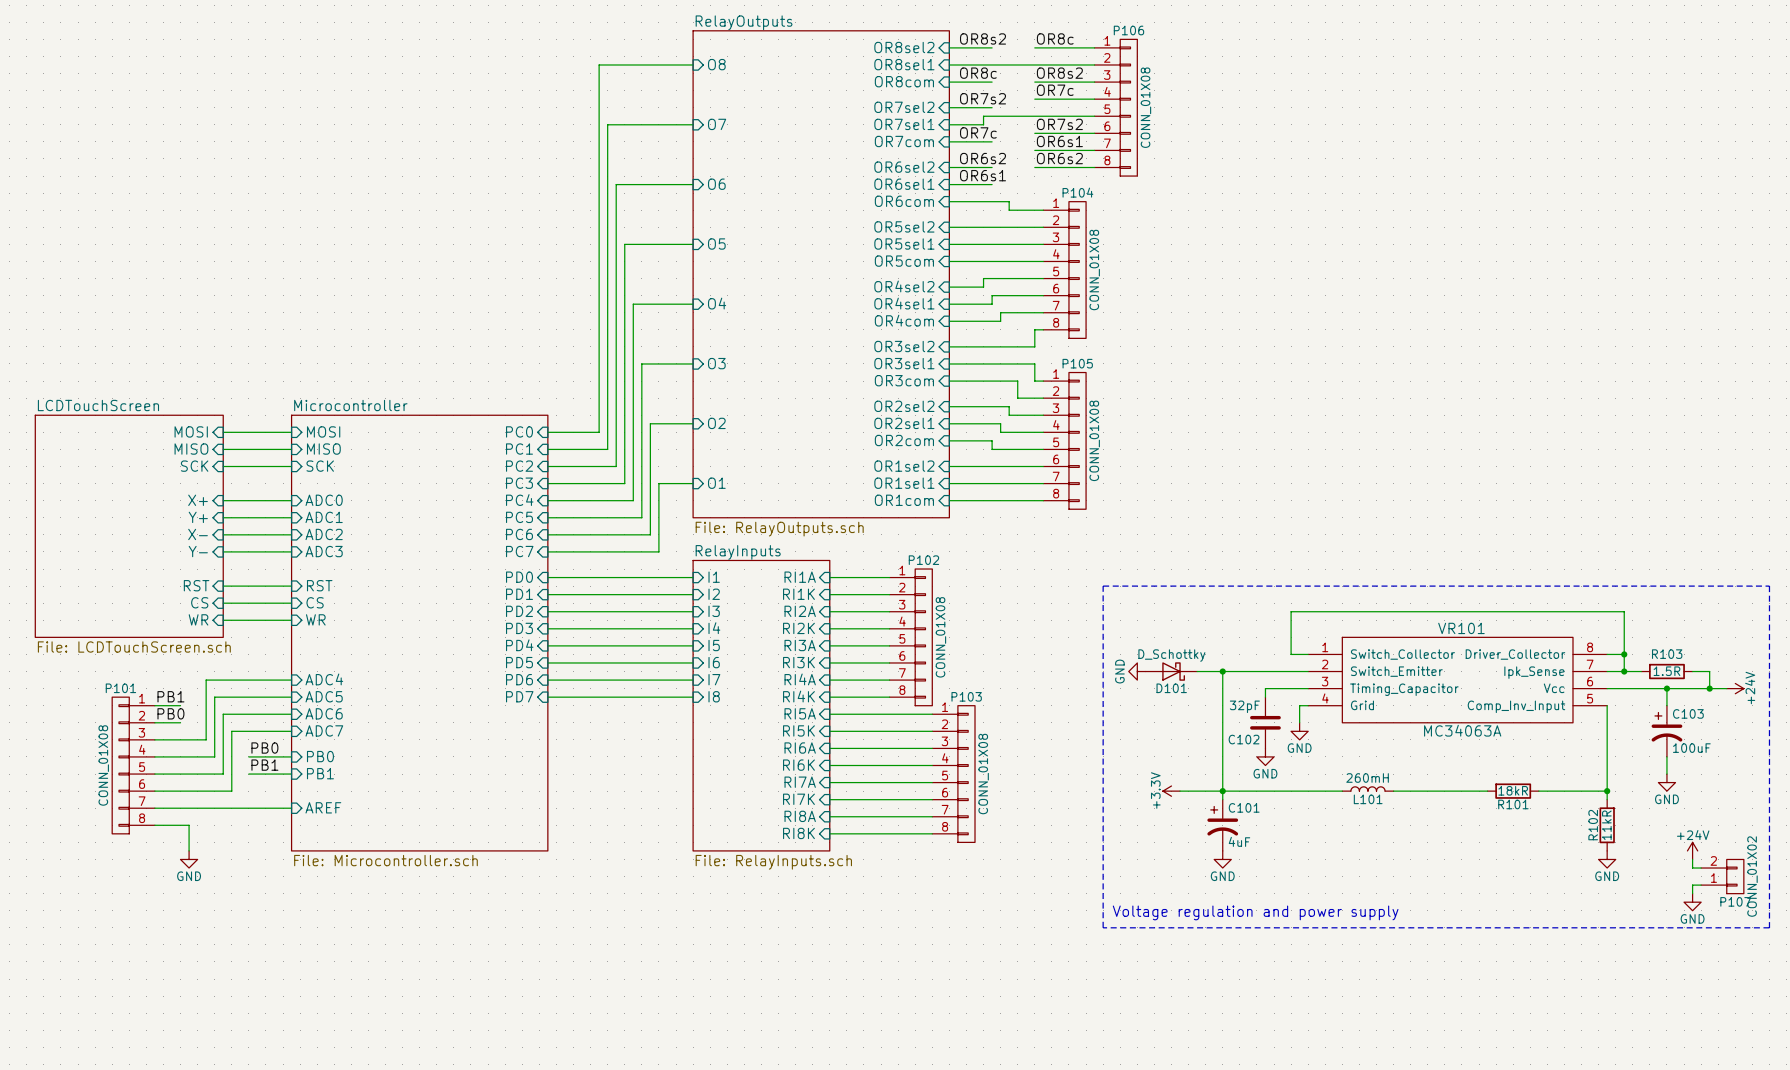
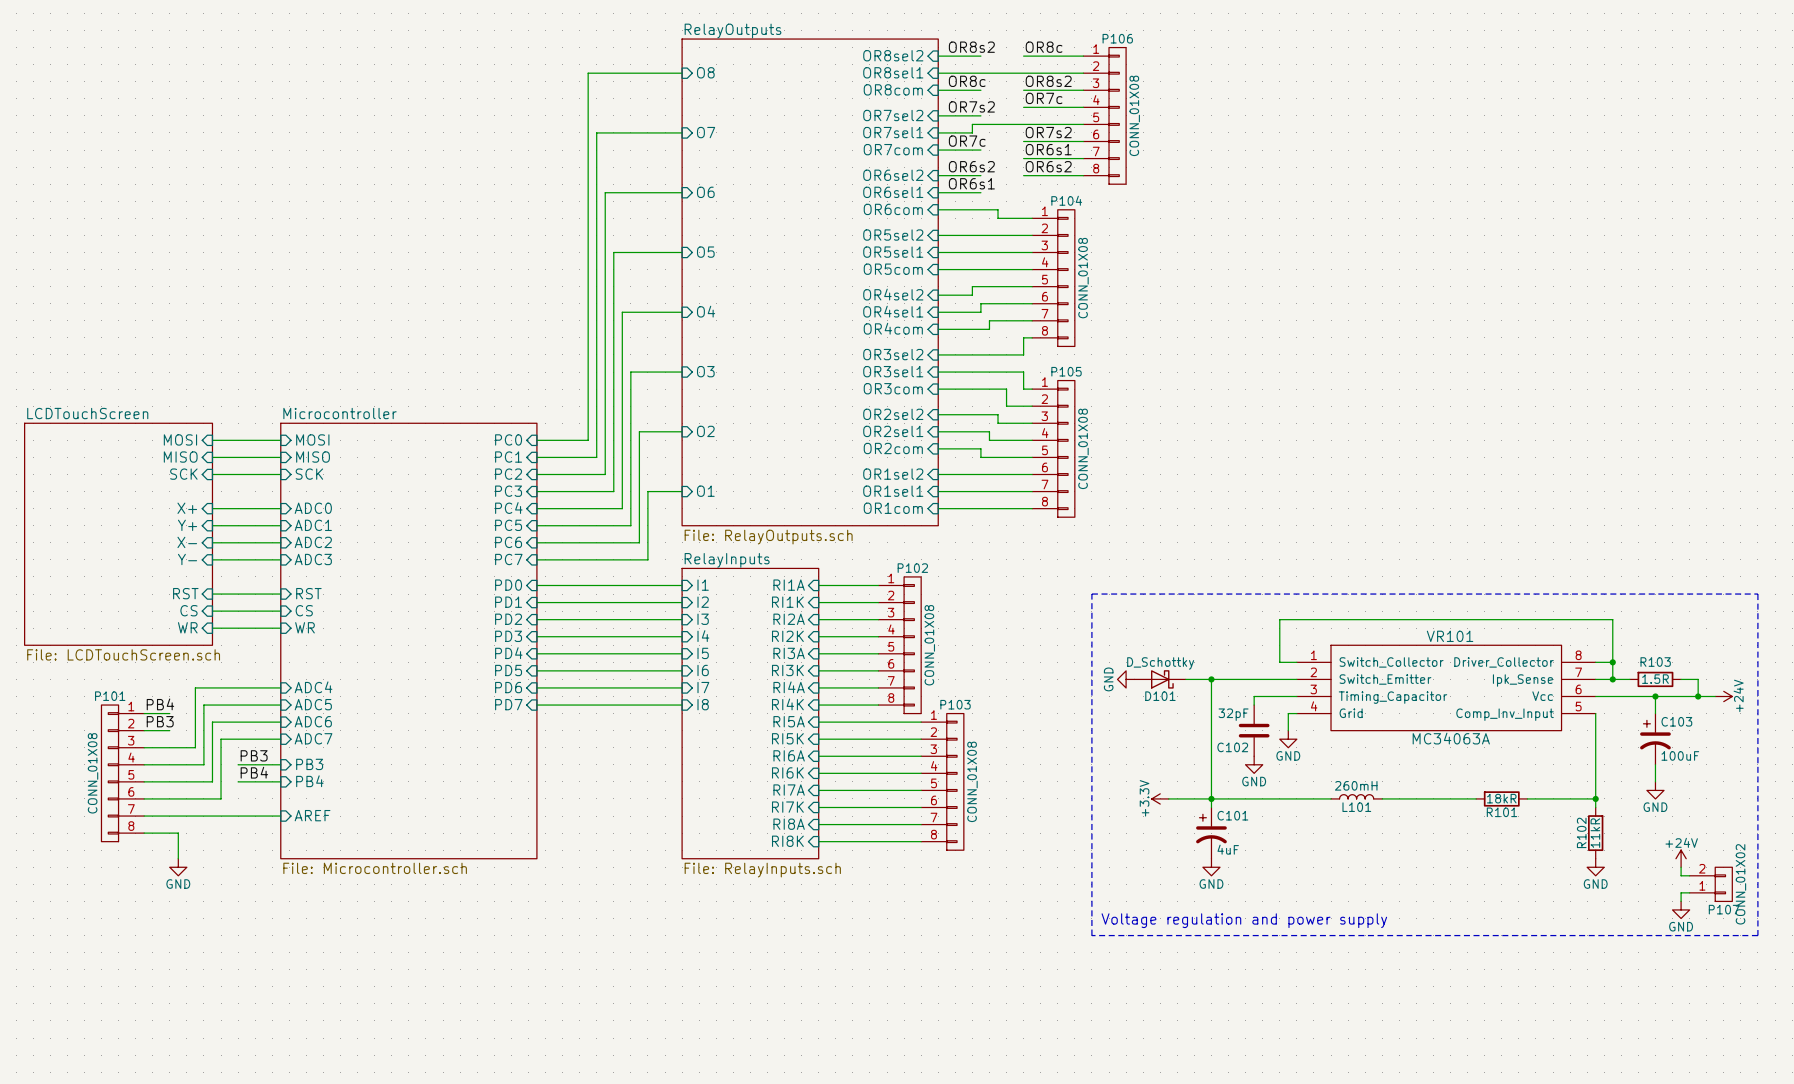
label: PB1 (170, 696) -> PB4 (160, 704)
label: PB0 (170, 713) -> PB3 (160, 721)
label: PB0 (264, 748) -> PB3 (254, 755)
sheet pin: PB0 (320, 756) -> PB3 (309, 764)
label: PB1 (264, 765) -> PB4 (254, 772)
sheet pin: PB1 (320, 773) -> PB4 (309, 781)

